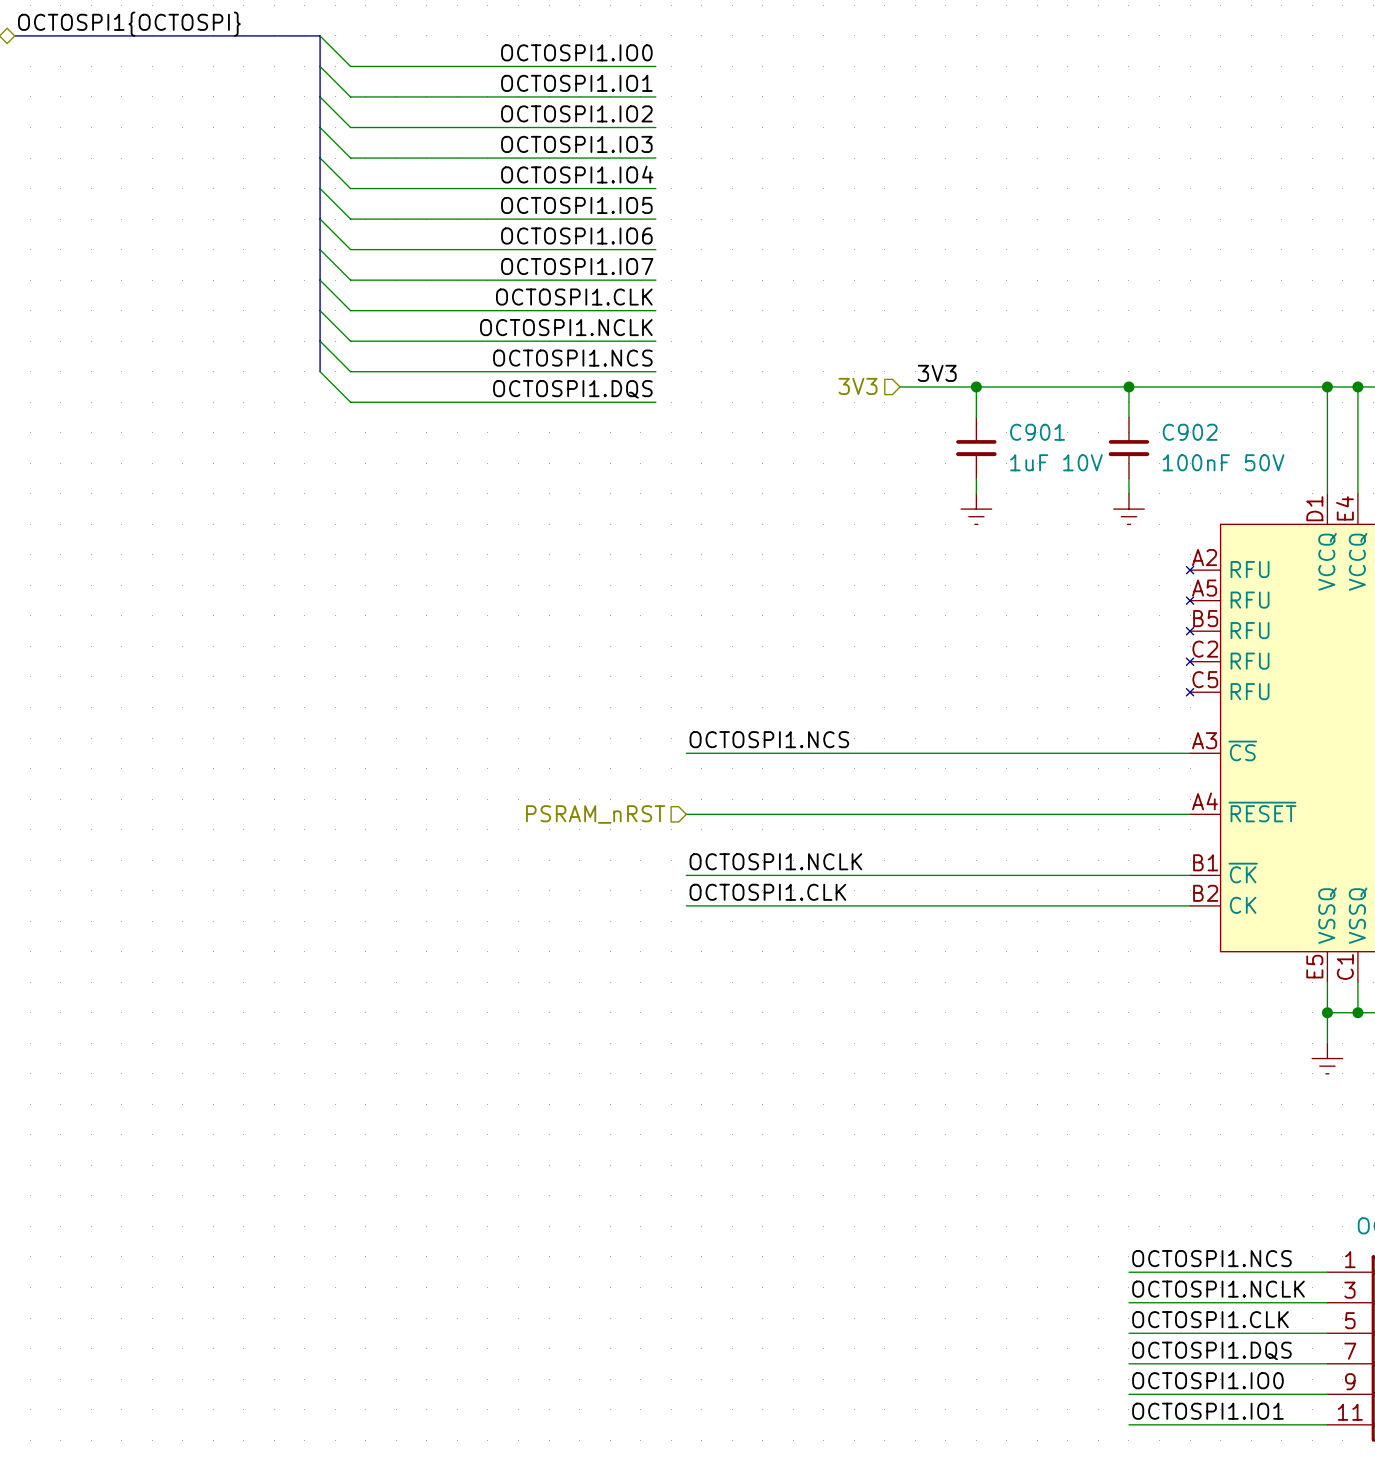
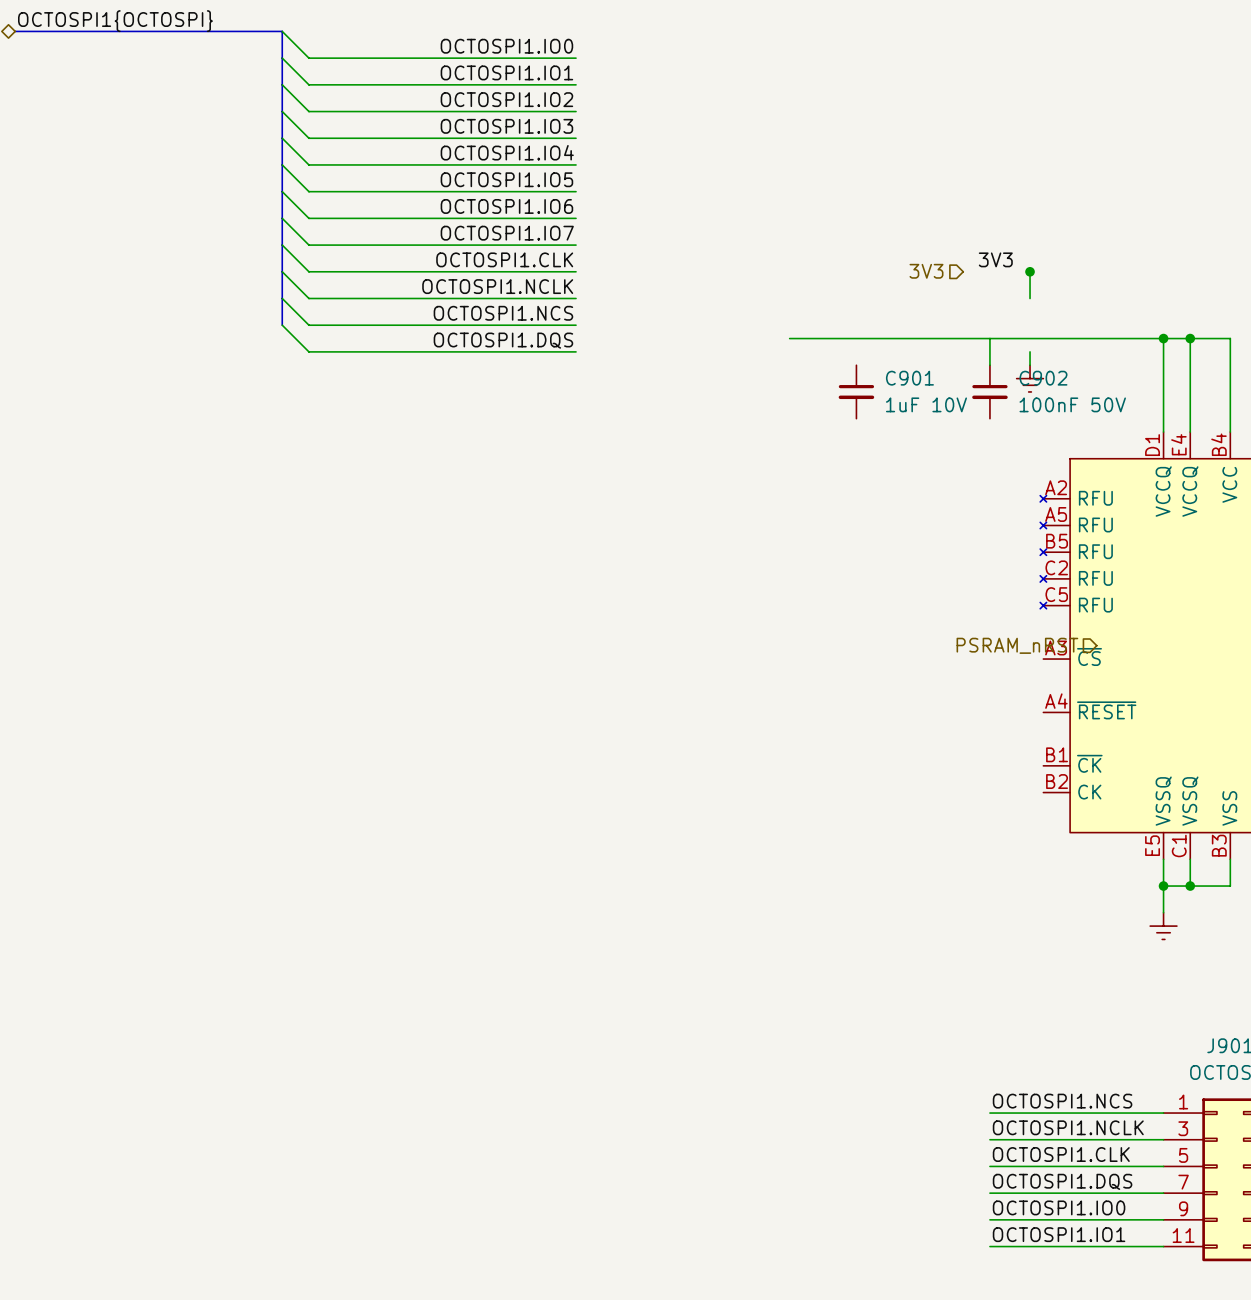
junction: none -> (1030, 271)
label position: 3V3 (937, 373) -> 3V3 (995, 259)
hierarchical label position: 3V3 (858, 386) -> 3V3 (926, 271)
wire: (976, 386) (976, 417) -> (1030, 271) (1030, 298)
junction: (976, 386) -> none
junction: (1128, 386) -> none
wire: (976, 478) (976, 493) -> (1030, 351) (1030, 365)
wire: (1128, 478) (1128, 493) -> none
power symbol: (976, 509) -> none
power symbol position: (1128, 509) -> (1030, 378)
hierarchical label: none -> PSRAM_nRST (1017, 645)
label: OCTOSPI1.NCS (769, 739) -> none
wire: (686, 753) (1190, 753) -> none
hierarchical label: PSRAM_nRST (595, 814) -> none
wire: (686, 814) (1190, 814) -> none
label: OCTOSPI1.NCLK (775, 861) -> none
wire: (686, 875) (1190, 875) -> none
label: OCTOSPI1.CLK (767, 892) -> none
wire: (686, 905) (1190, 905) -> none

